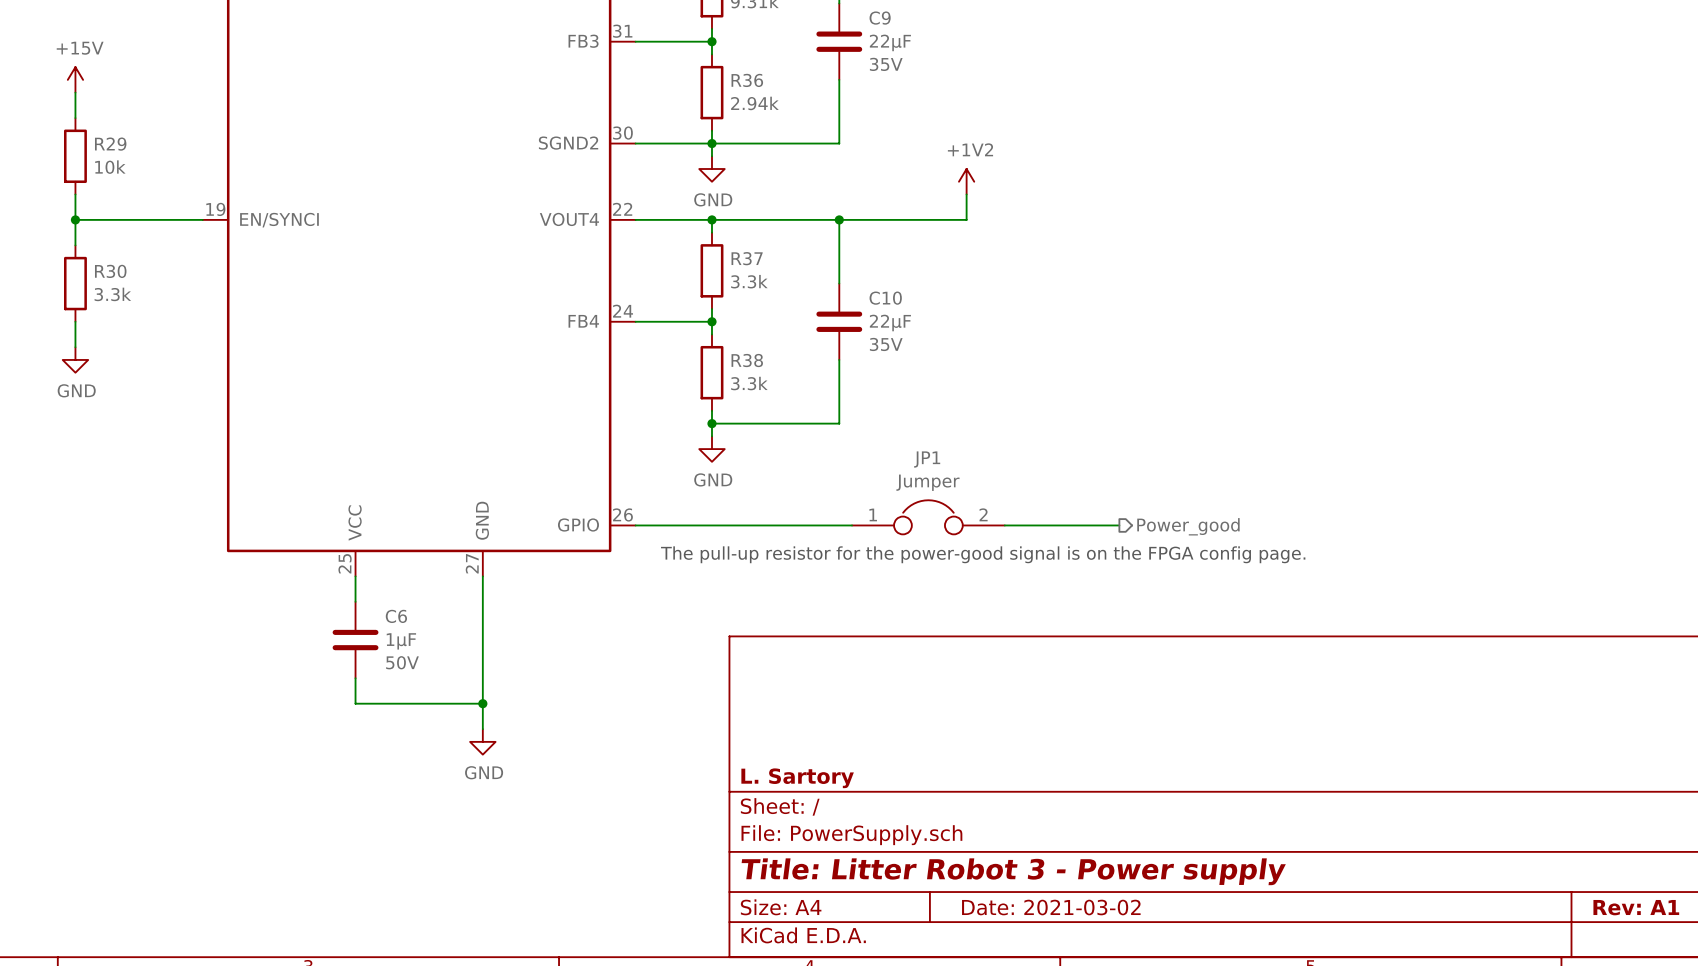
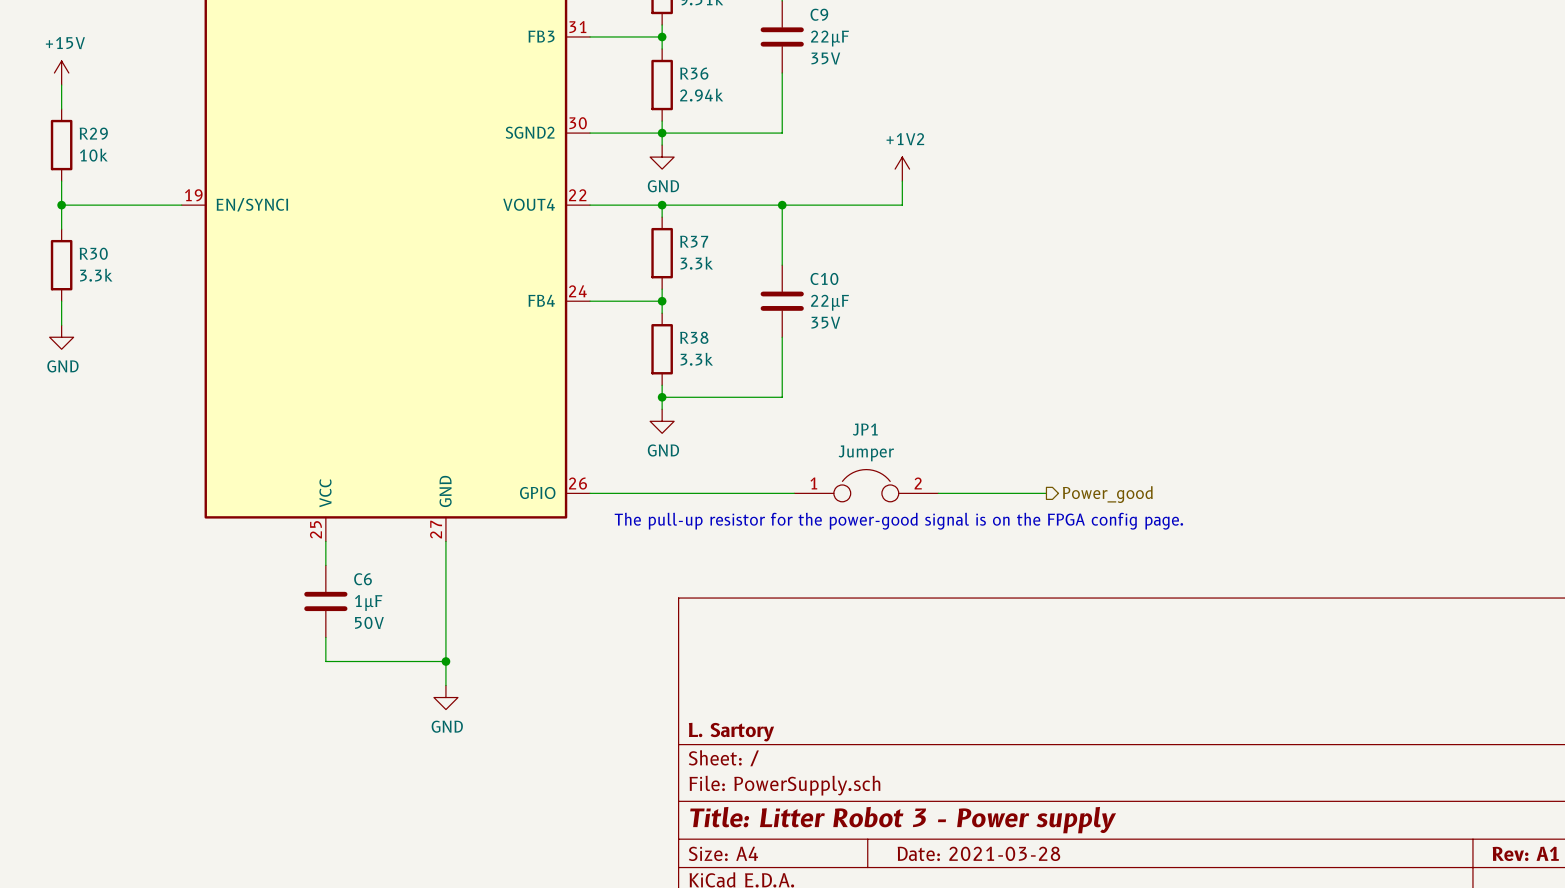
title block: Date: 2021-03-02 (1051, 907) -> Date: 2021-03-28 (978, 853)

